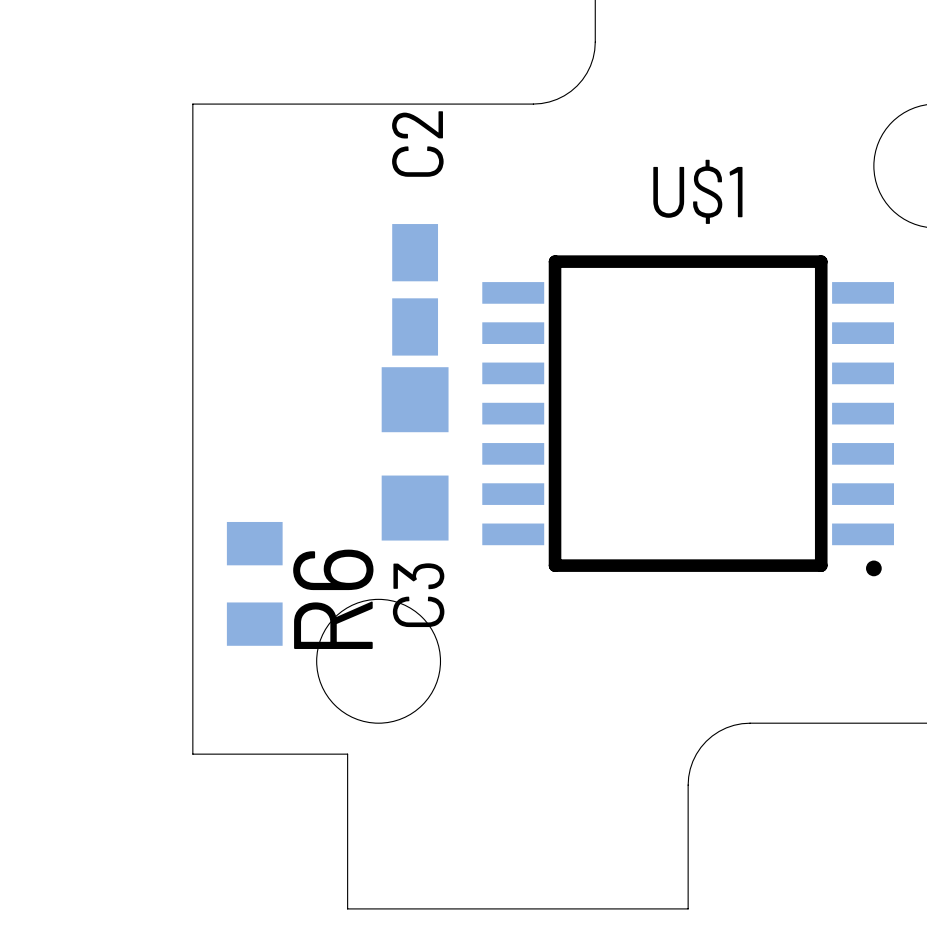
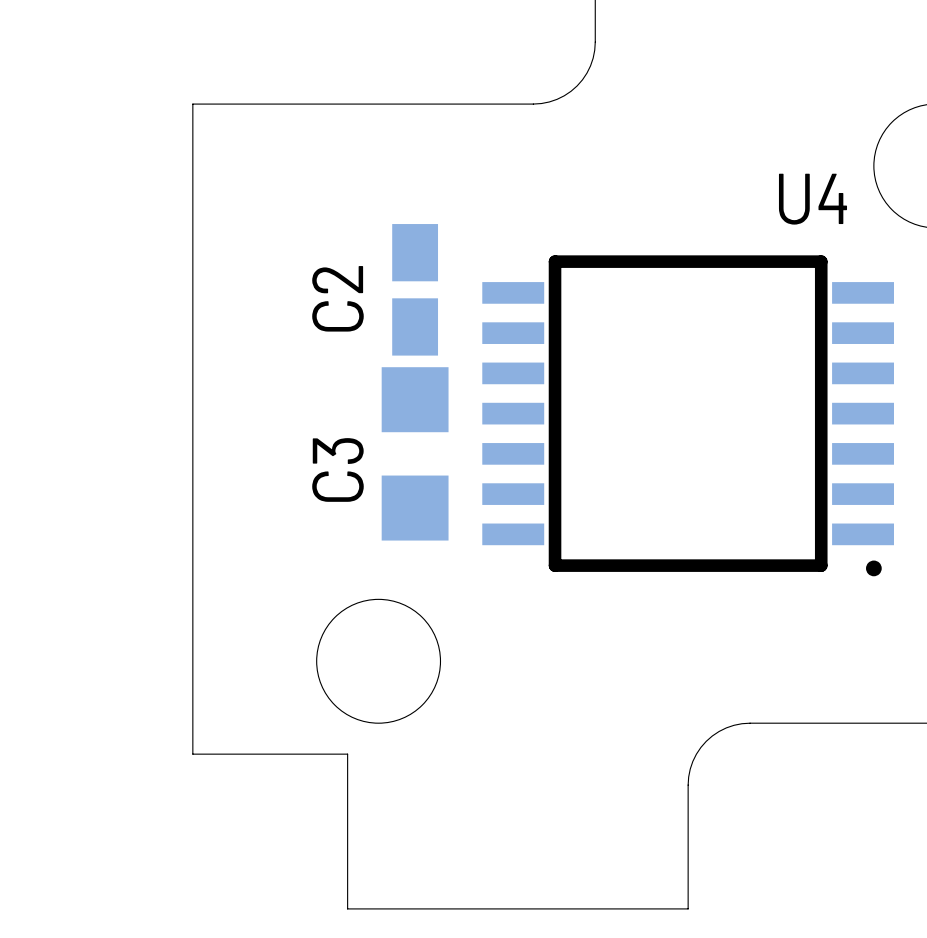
C2 name position: C2 (417, 144) -> C2 (337, 298)
U$1 name: U$1 (697, 191) -> U4 (812, 199)
R6: (254, 583) -> none
C3 name position: C3 (418, 595) -> C3 (337, 469)

